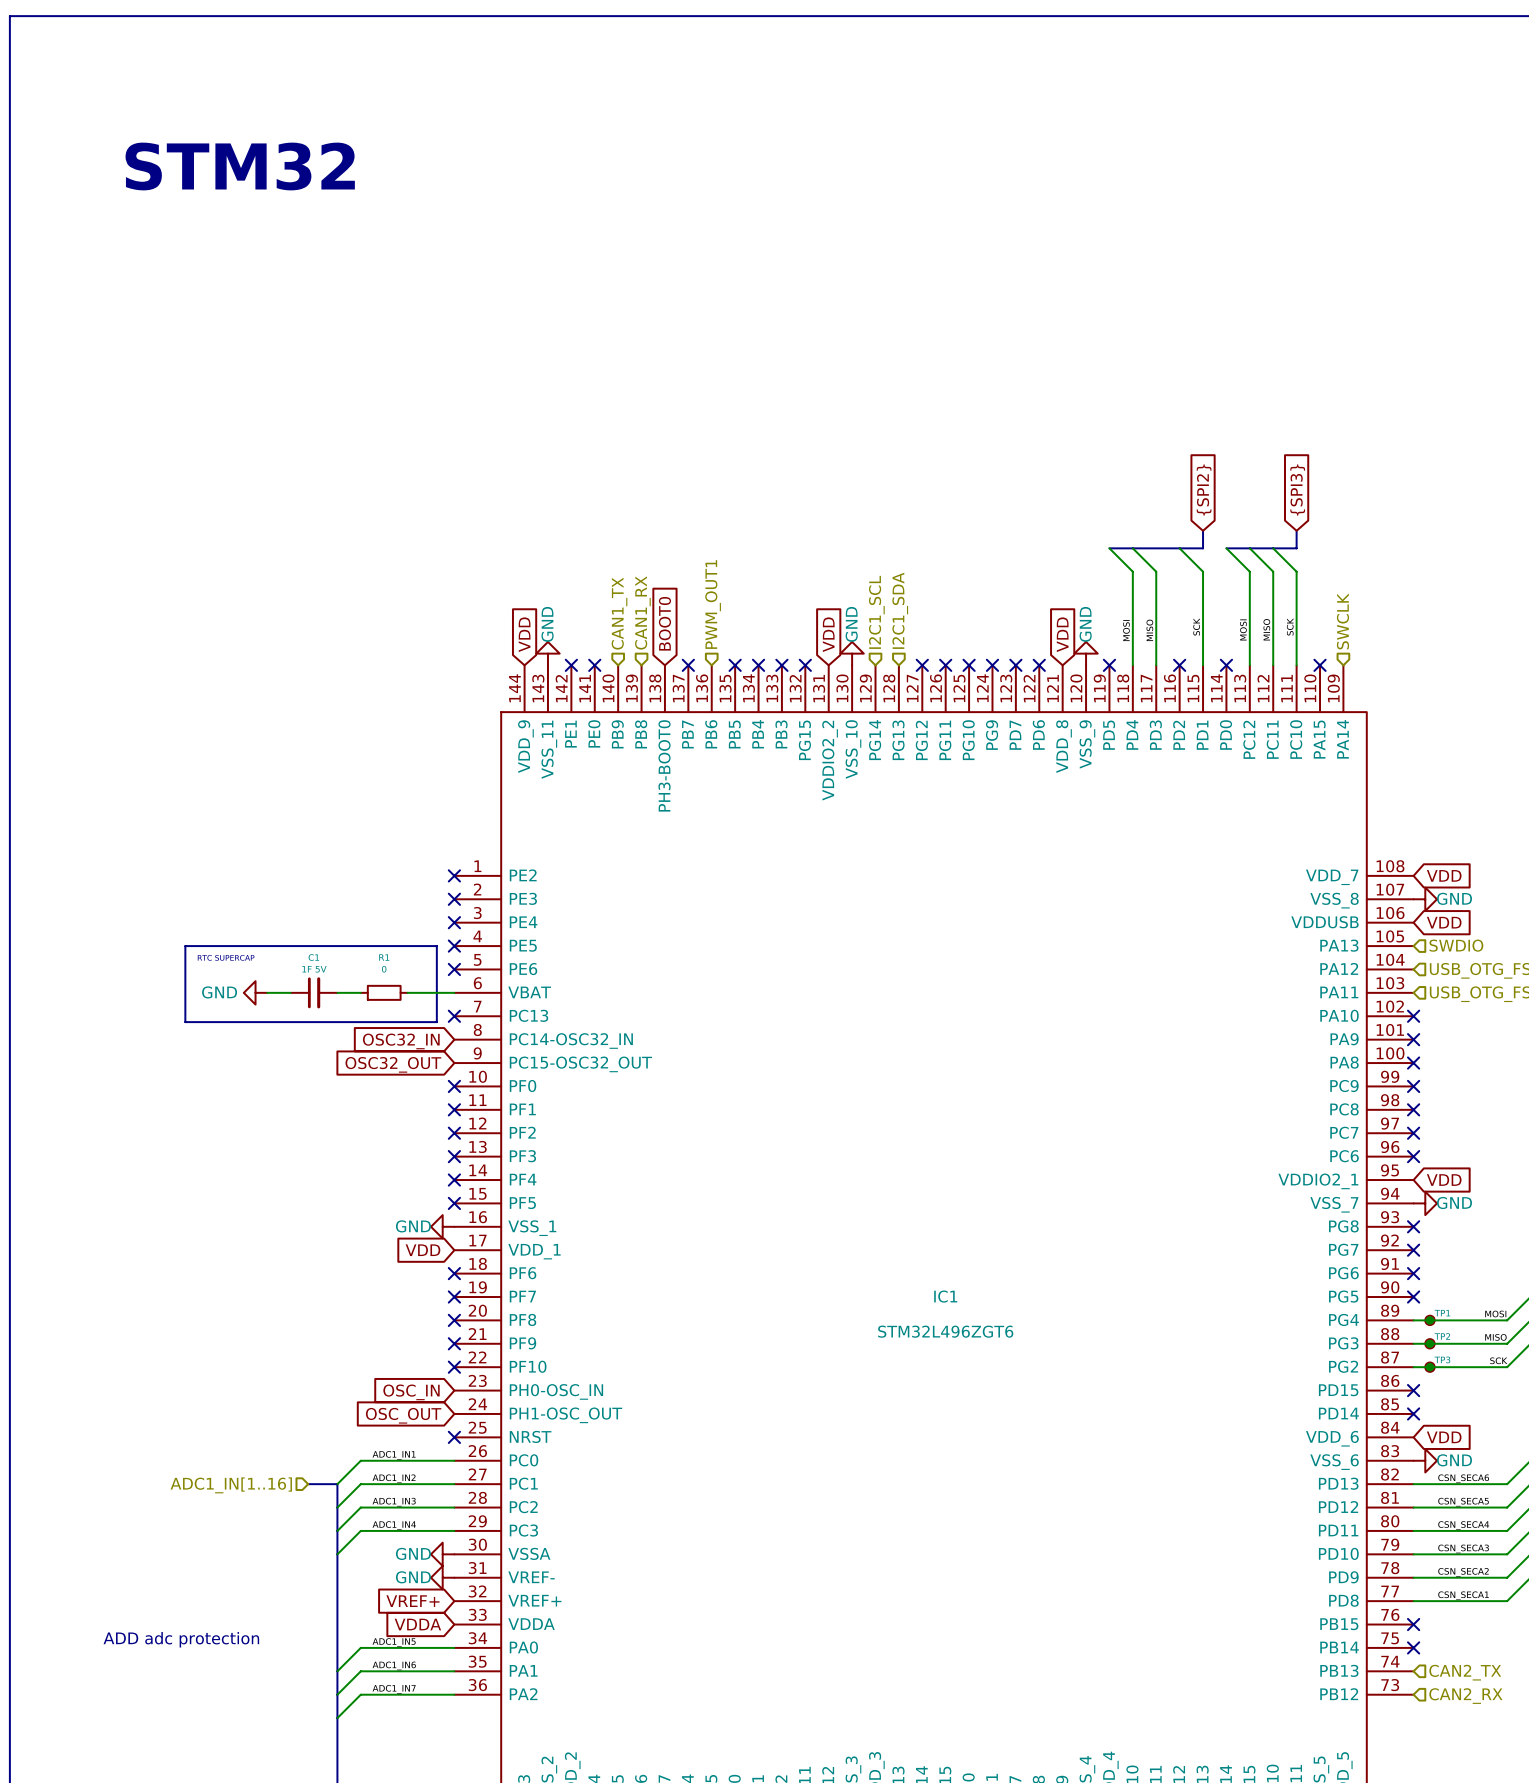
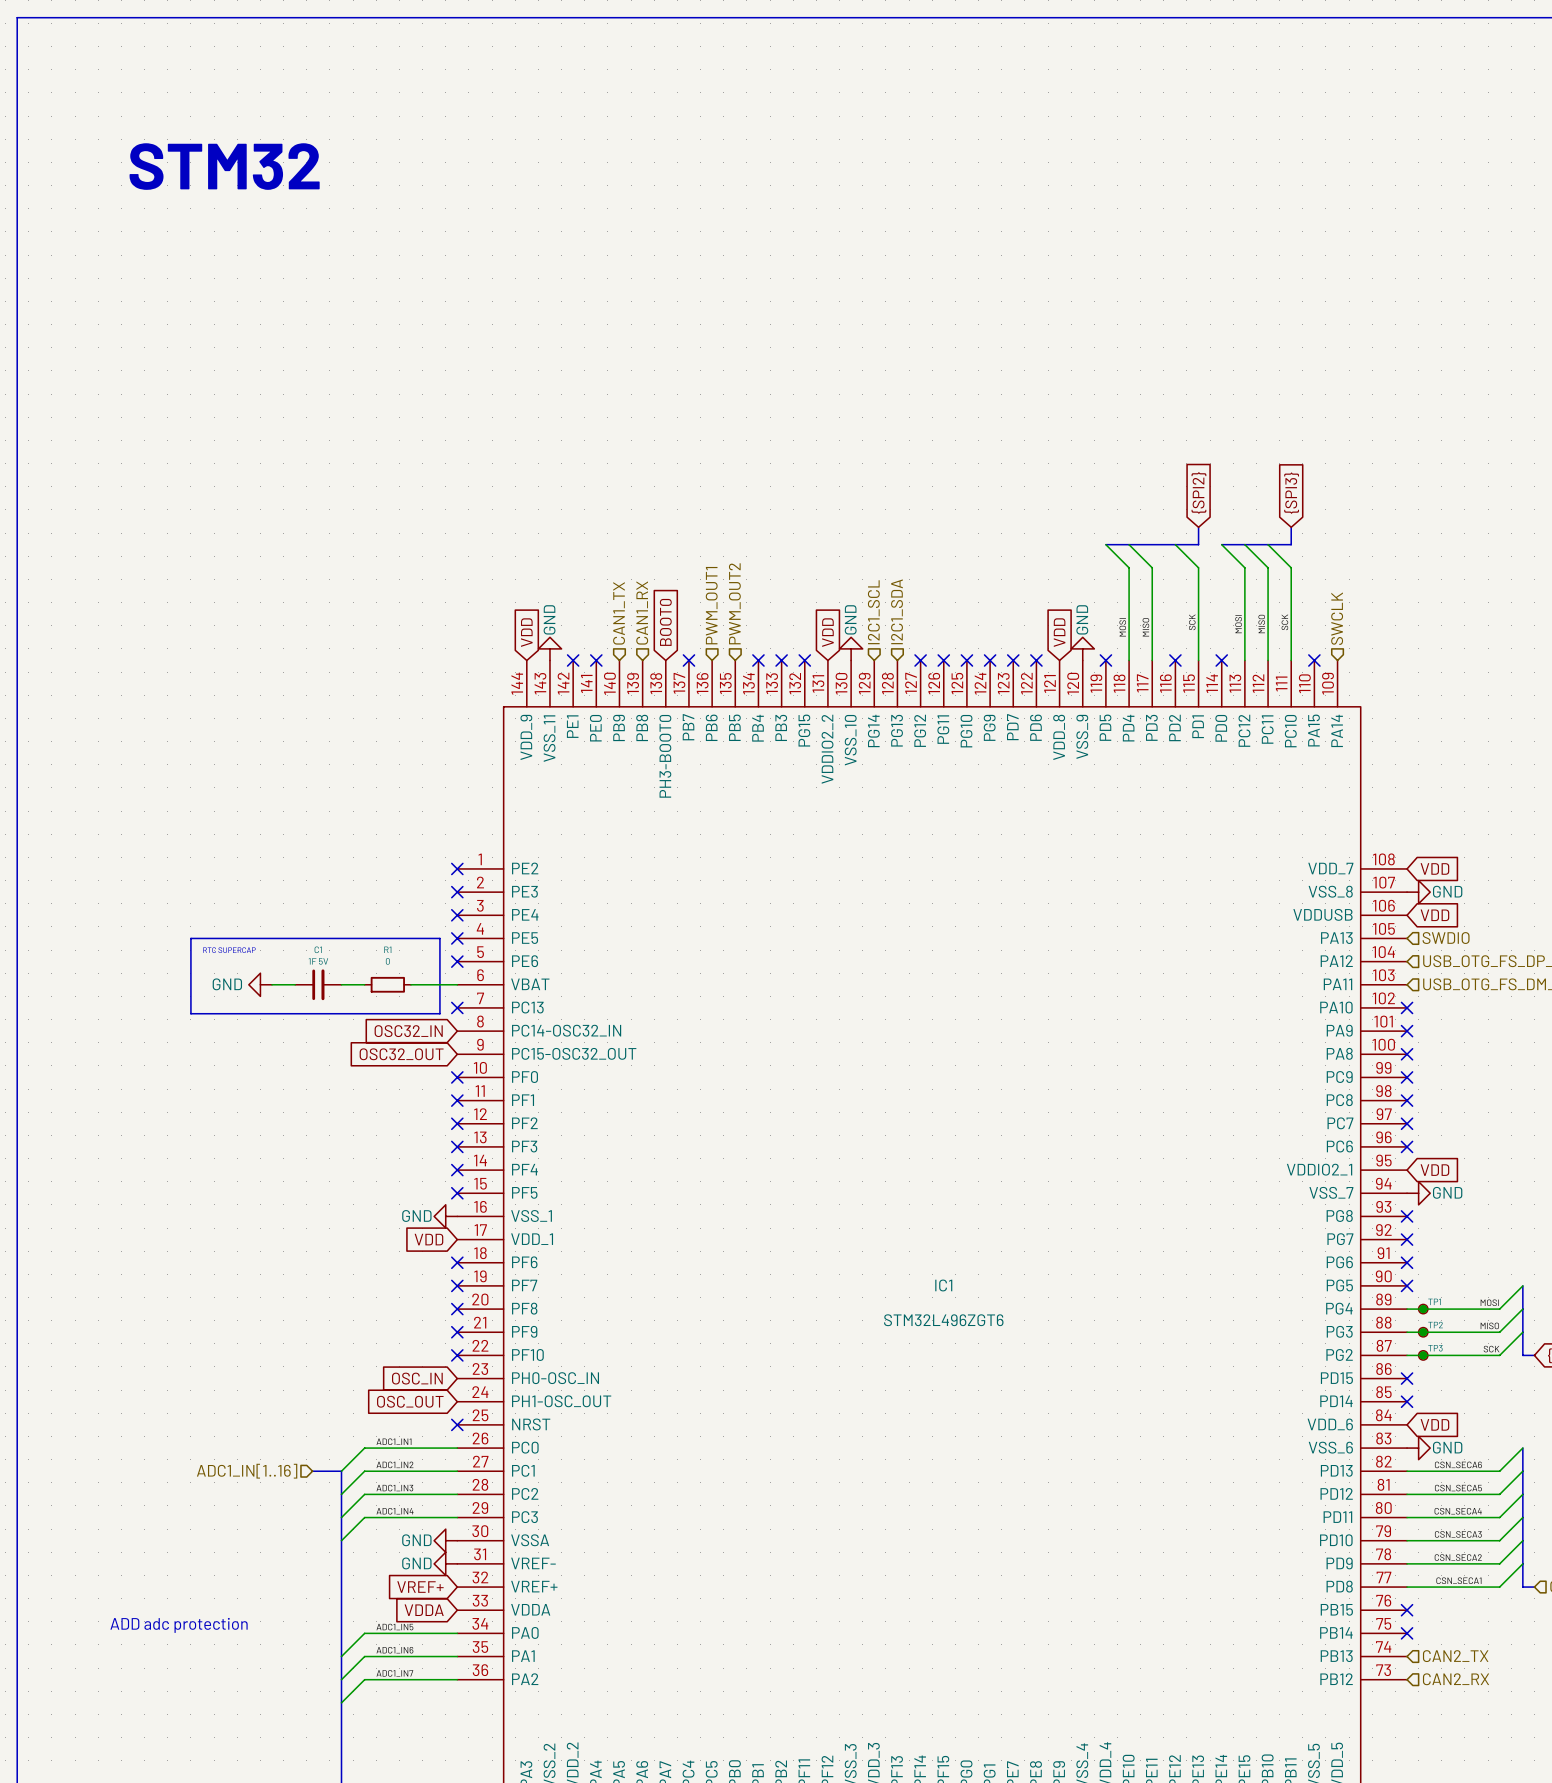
hierarchical label: none -> PWM_OUT2 (734, 603)
no-connect mark: (735, 665) -> none

